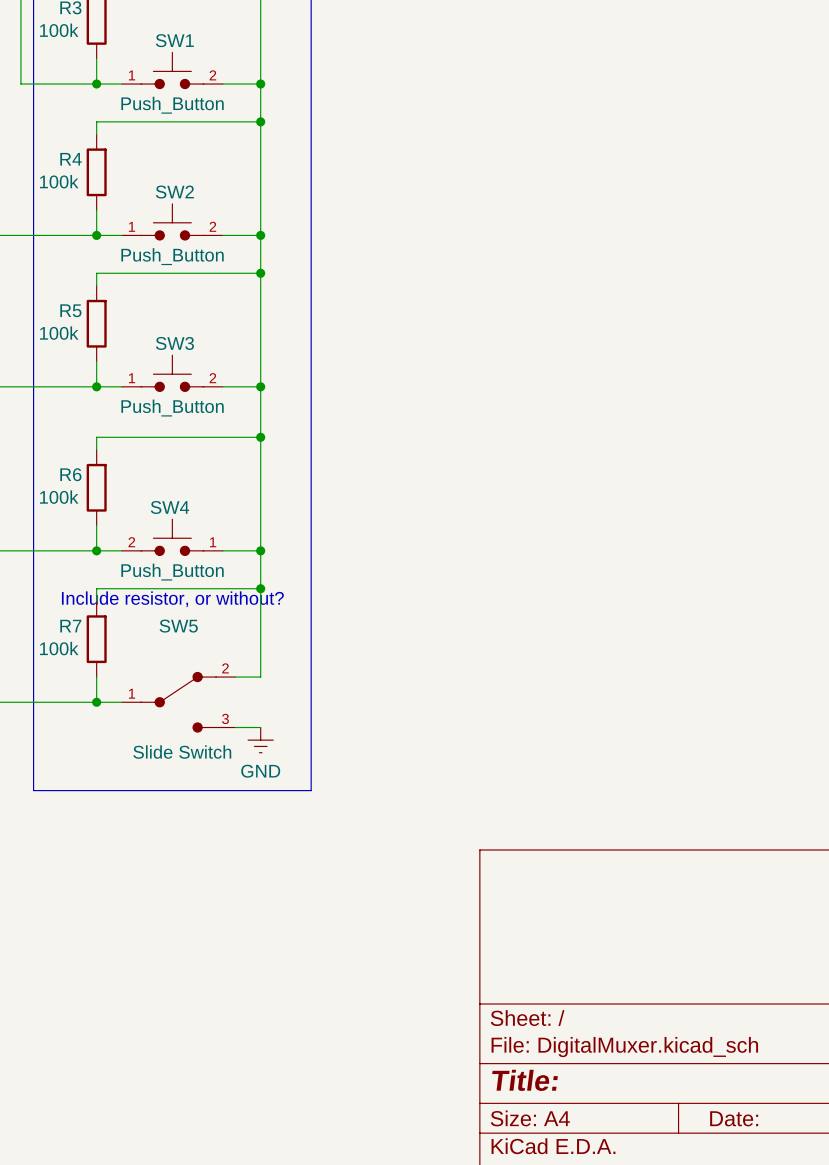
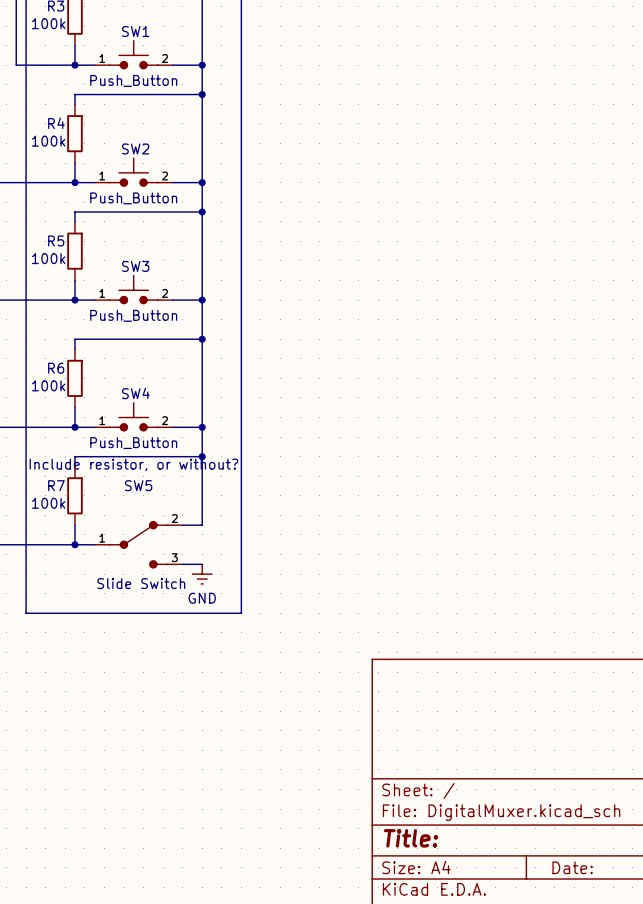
SW4 flip: as is (172, 537) -> left-right (133, 416)

